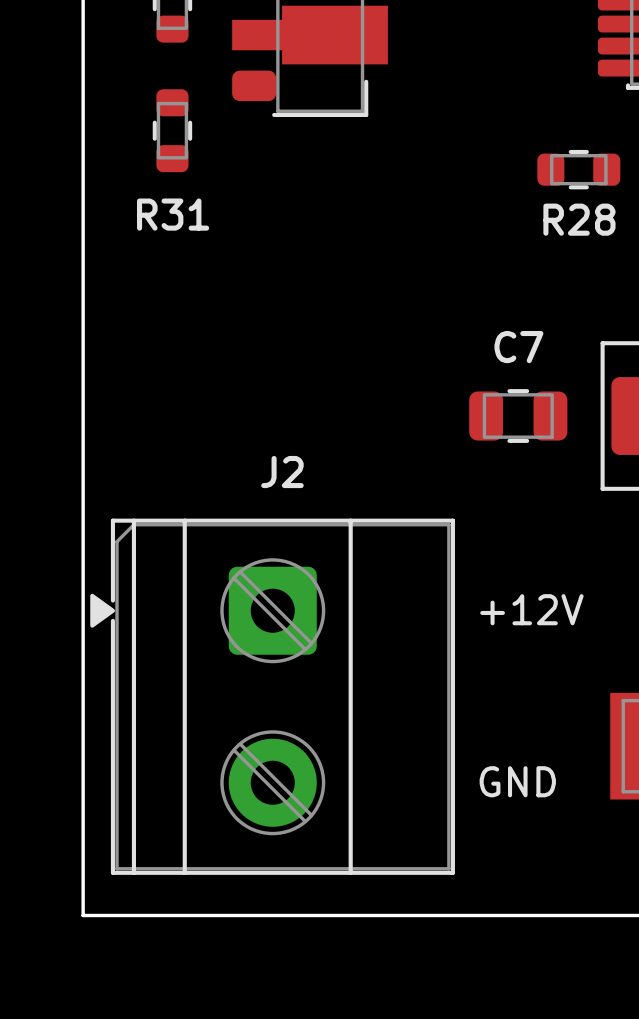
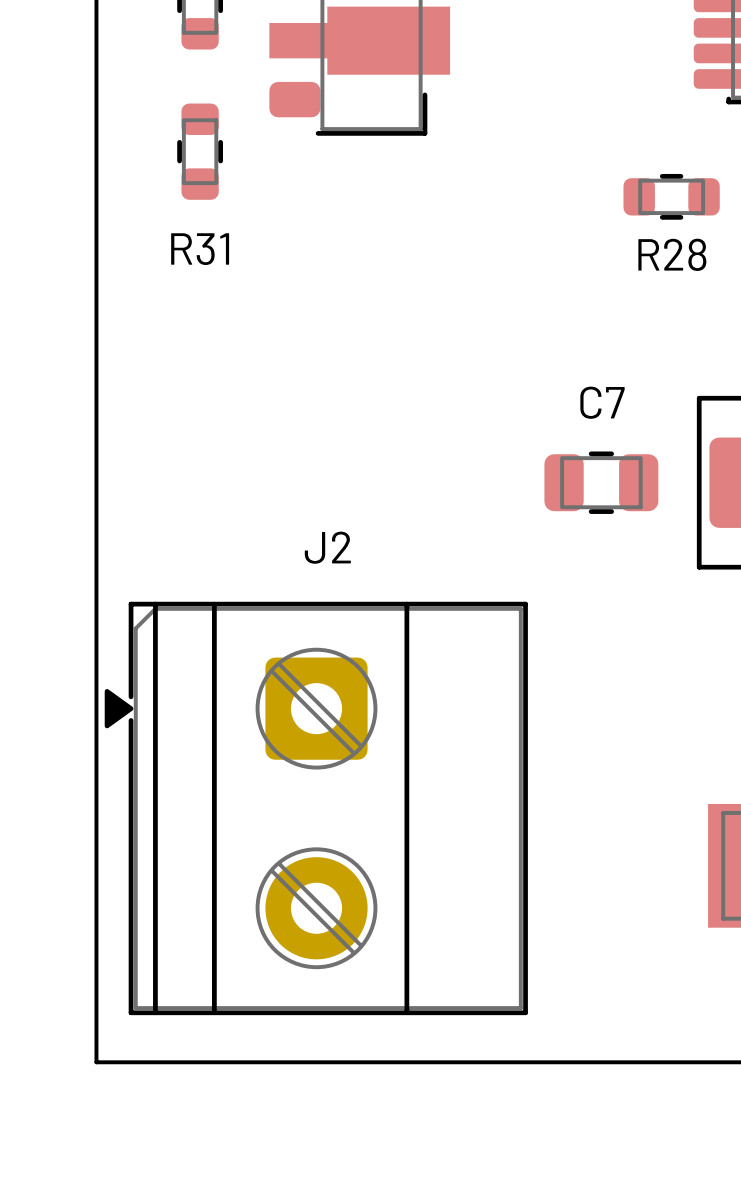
text: +12V (531, 609) -> none
text: GND (517, 781) -> none

